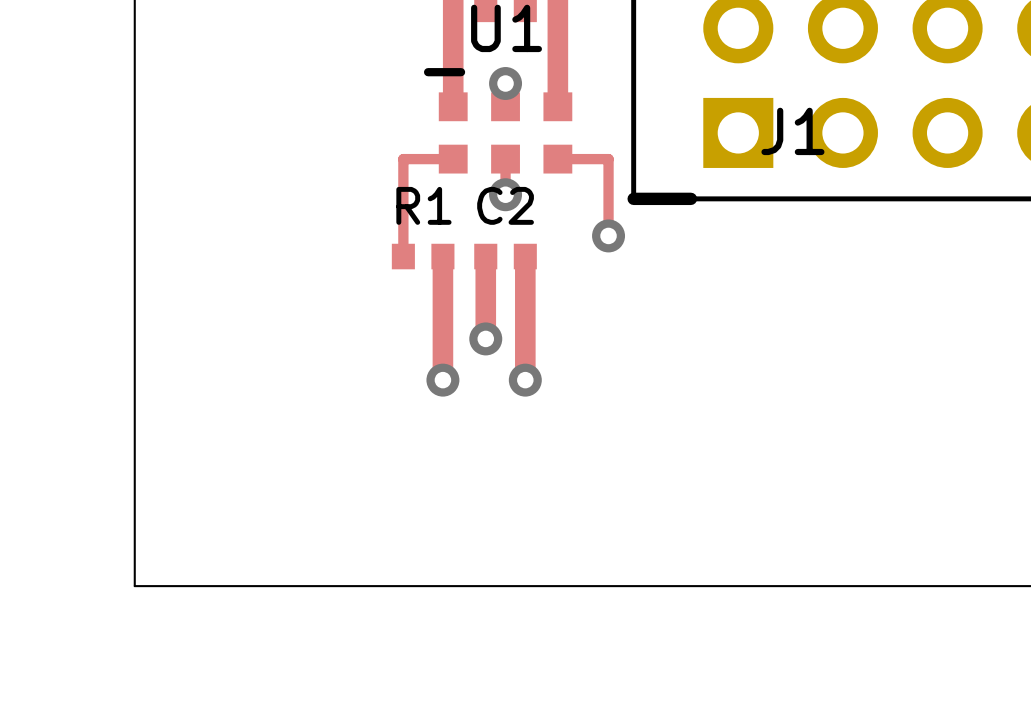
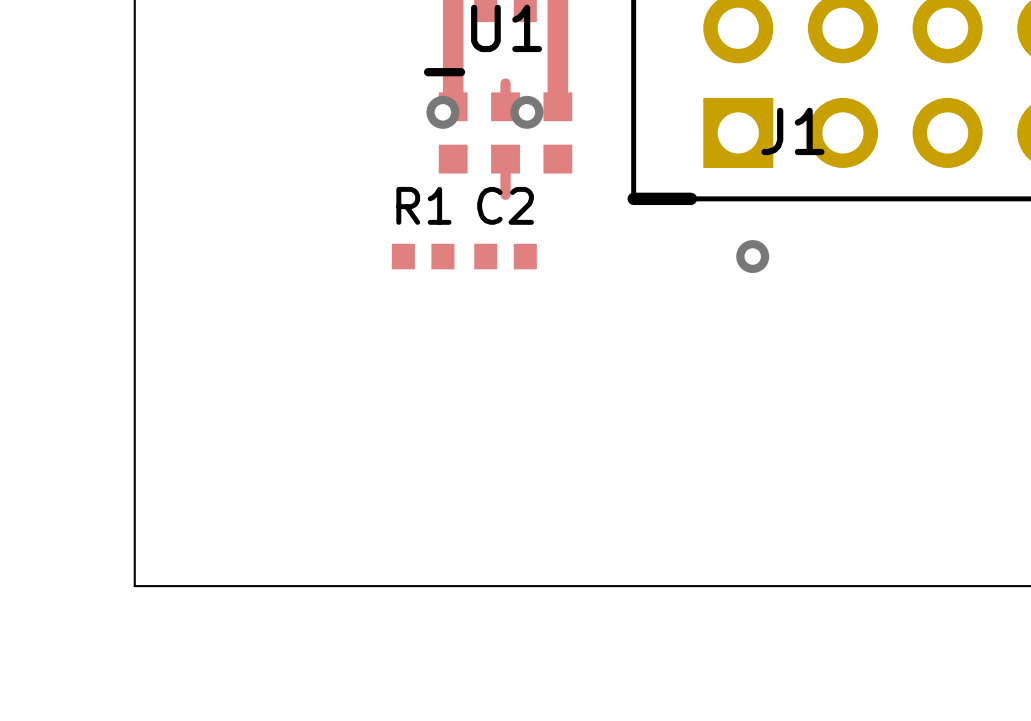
via position: (505, 83) -> (526, 112)
via: none -> (442, 112)
track: (453, 159) (403, 159) (403, 256) -> none
track: (557, 159) (608, 159) (608, 235) -> none
via: (505, 194) -> none
via: (608, 235) -> none
track: (442, 256) (442, 380) -> none
track: (485, 256) (485, 338) -> none
track: (525, 256) (525, 380) -> none
via: none -> (752, 256)
via: (485, 338) -> none
via: (442, 380) -> none
via: (525, 380) -> none

